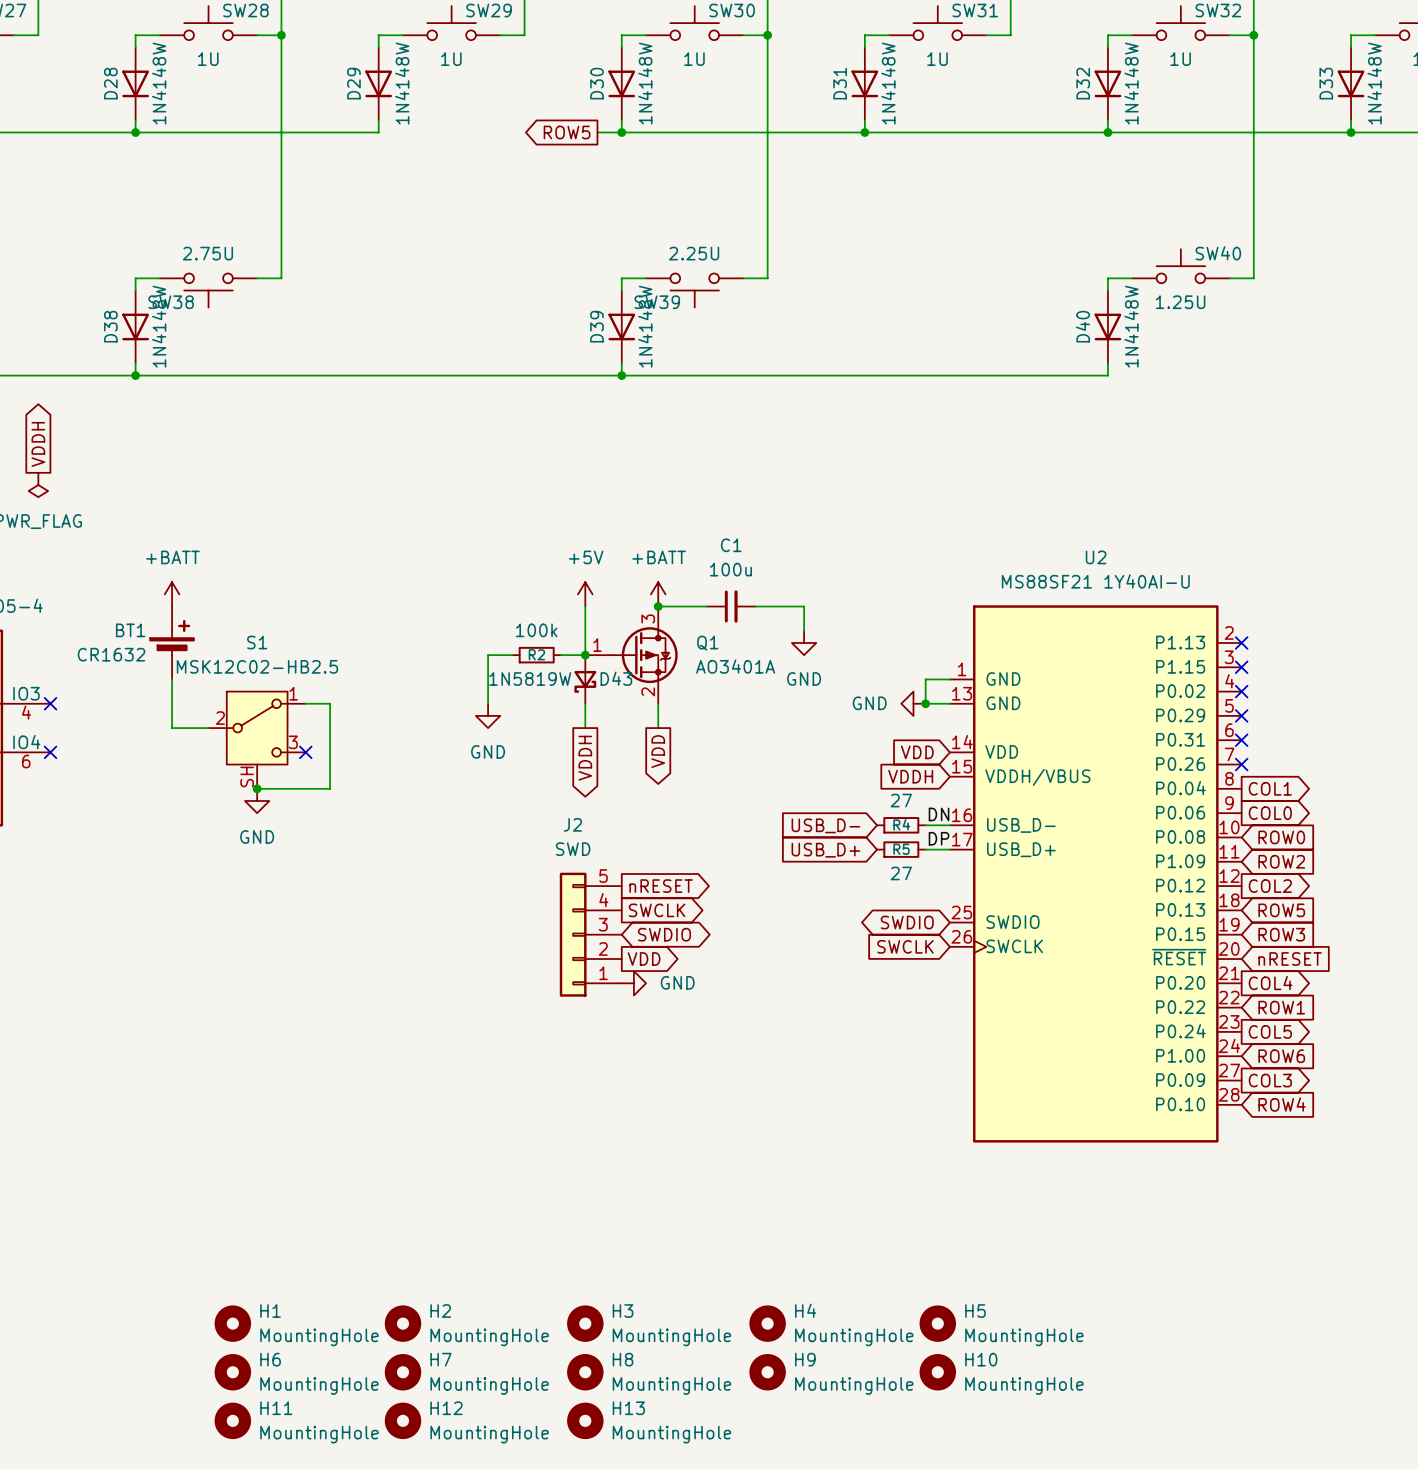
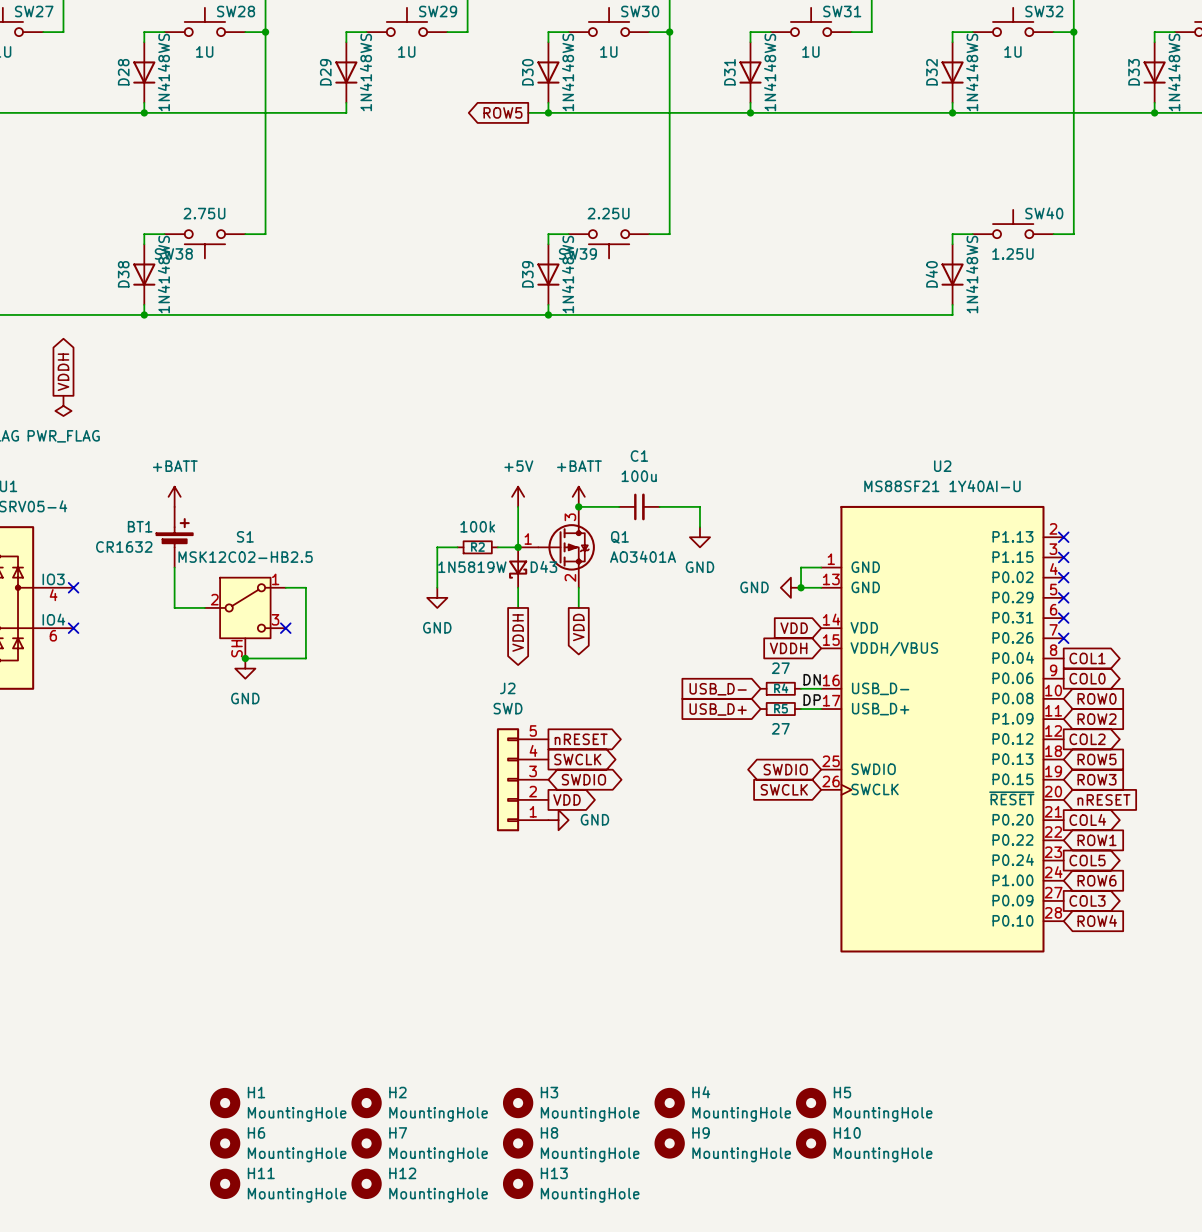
D28 value: 1N4148W (159, 83) -> 1N4148WS (163, 72)
D29 value: 1N4148W (402, 83) -> 1N4148WS (365, 72)
D30 value: 1N4148W (645, 83) -> 1N4148WS (568, 72)
D31 value: 1N4148W (888, 83) -> 1N4148WS (770, 72)
D32 value: 1N4148W (1131, 83) -> 1N4148WS (972, 72)
D33 value: 1N4148W (1374, 83) -> 1N4148WS (1174, 72)
D38 value: 1N4148W (159, 326) -> 1N4148WS (163, 274)
D39 value: 1N4148W (645, 326) -> 1N4148WS (568, 274)
D40 value: 1N4148W (1131, 326) -> 1N4148WS (972, 274)

